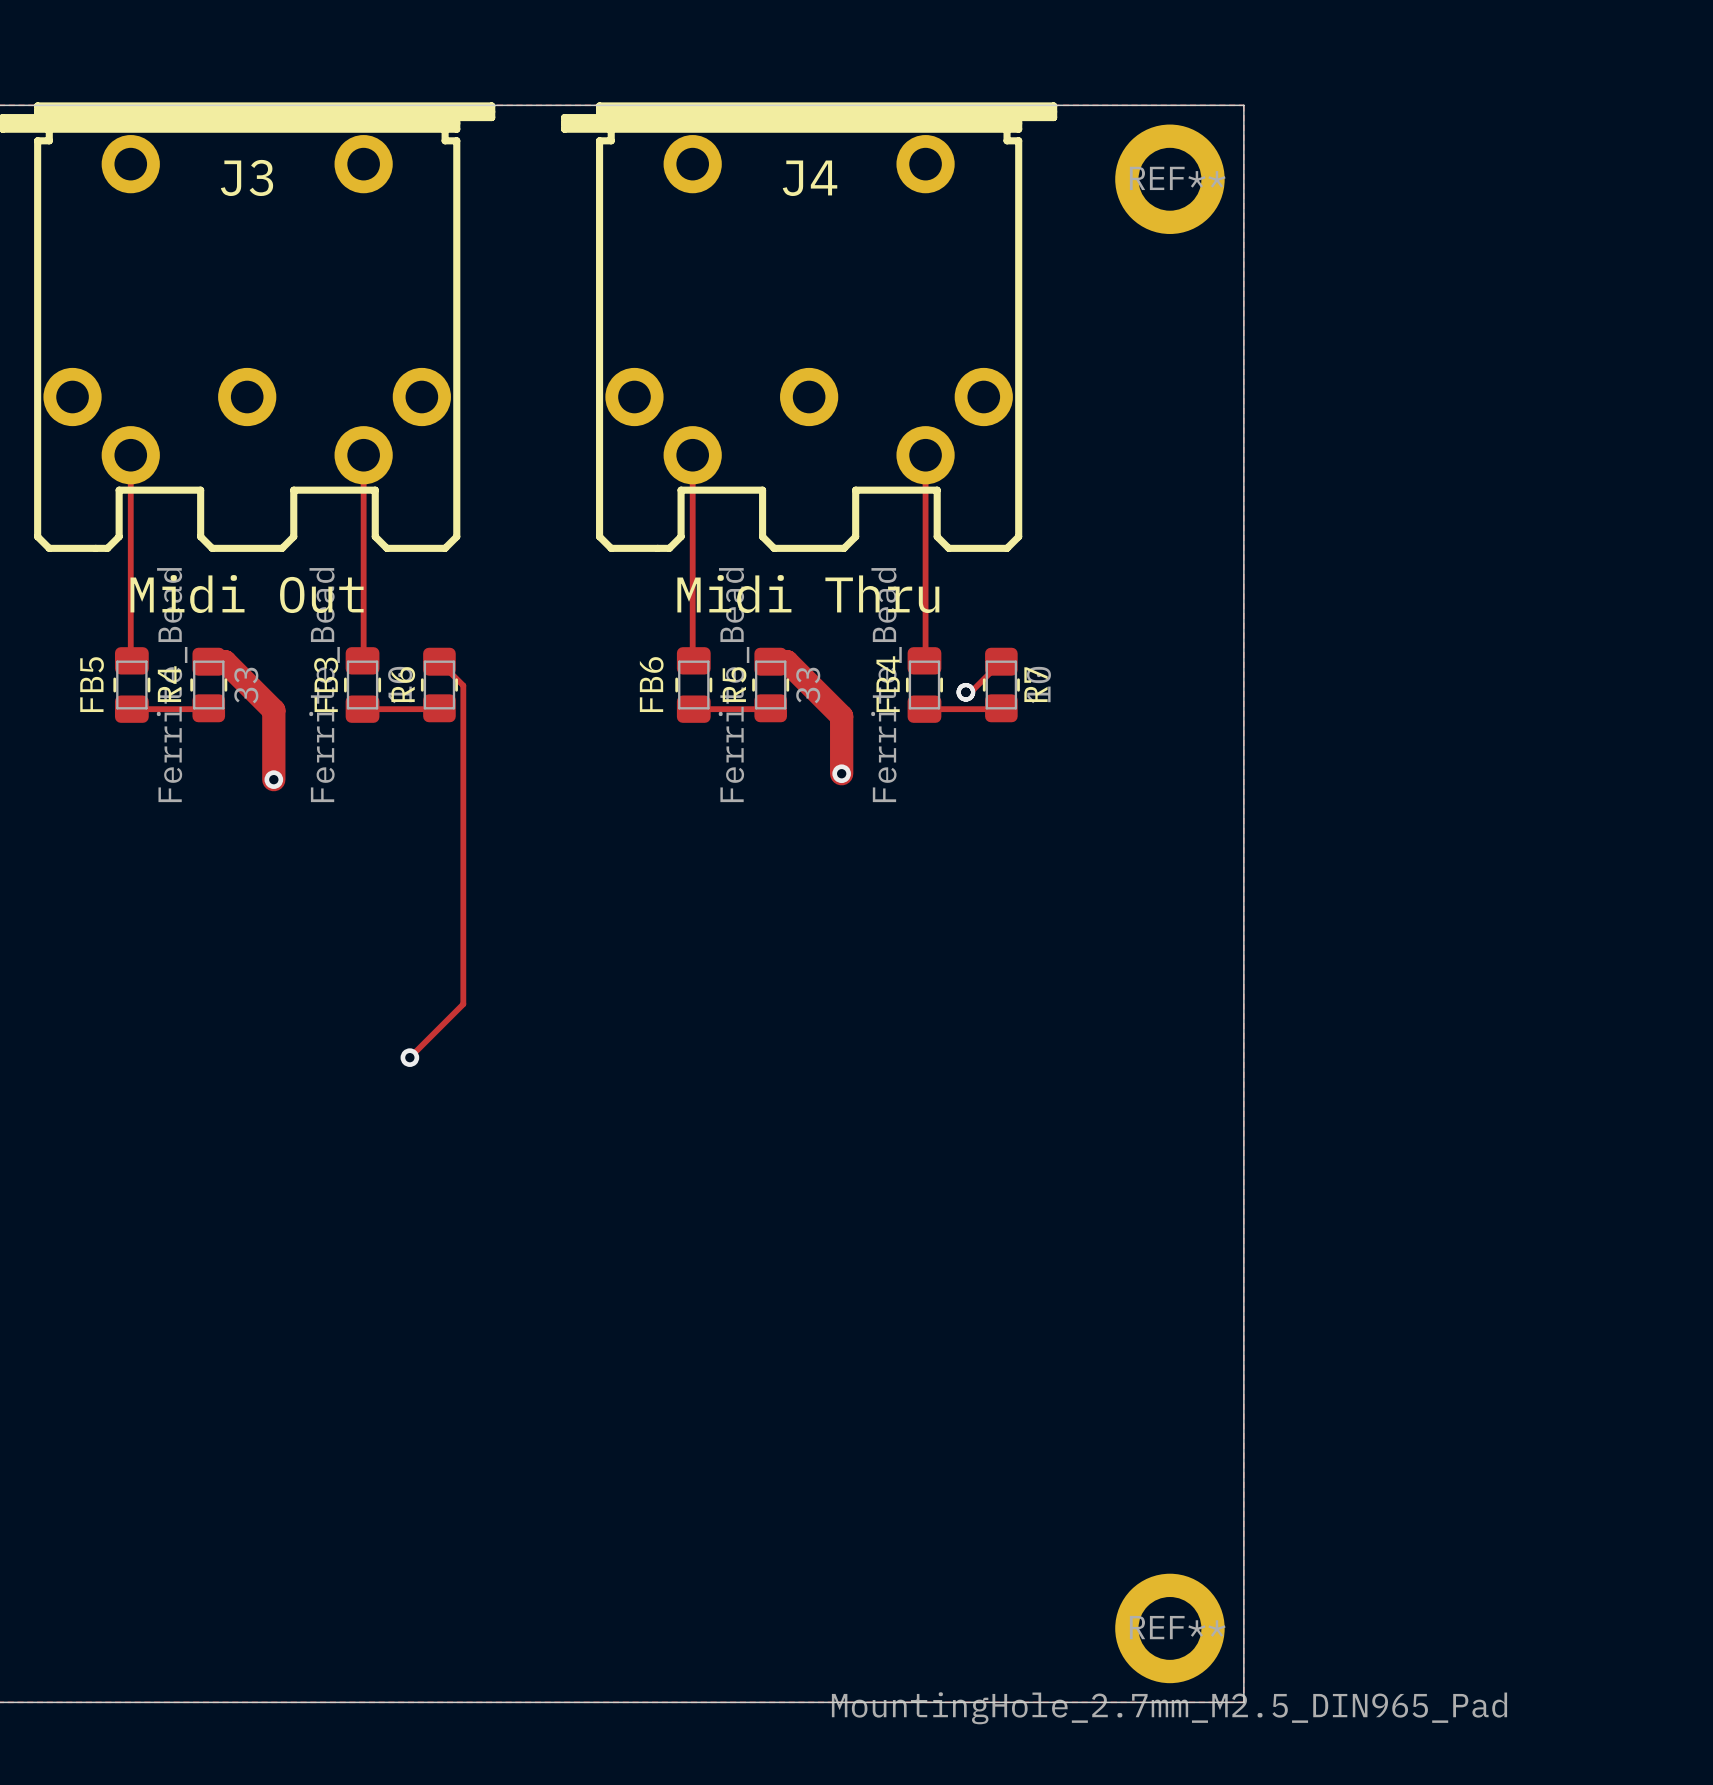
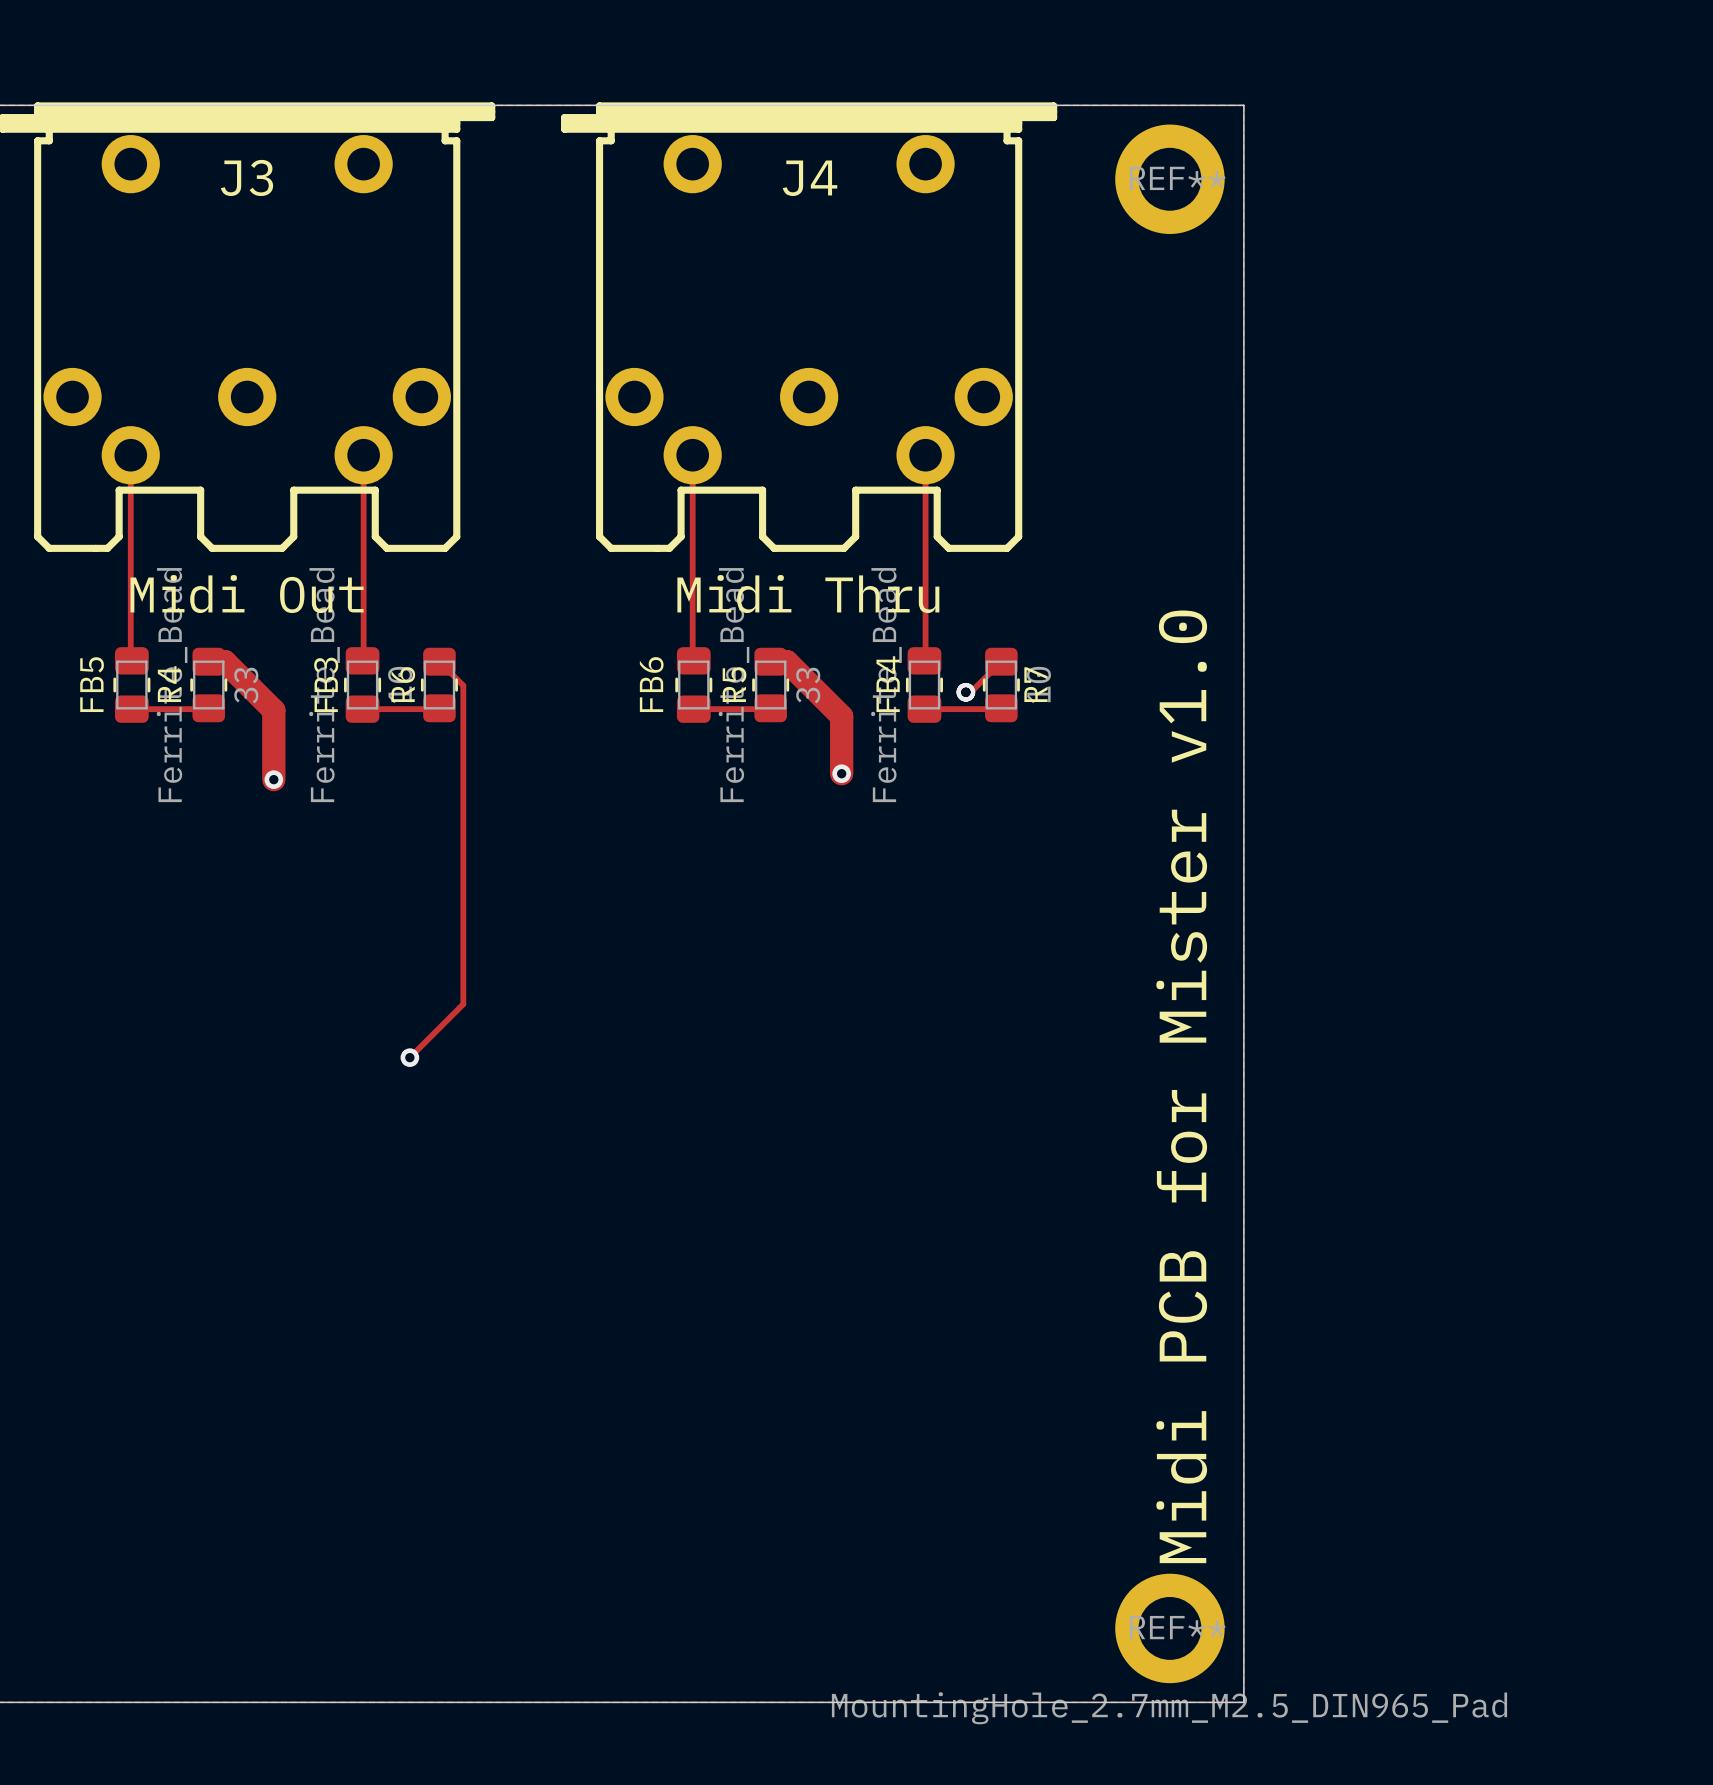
text: none -> Midi PCB for Mister v1.0 (1181, 1086)

